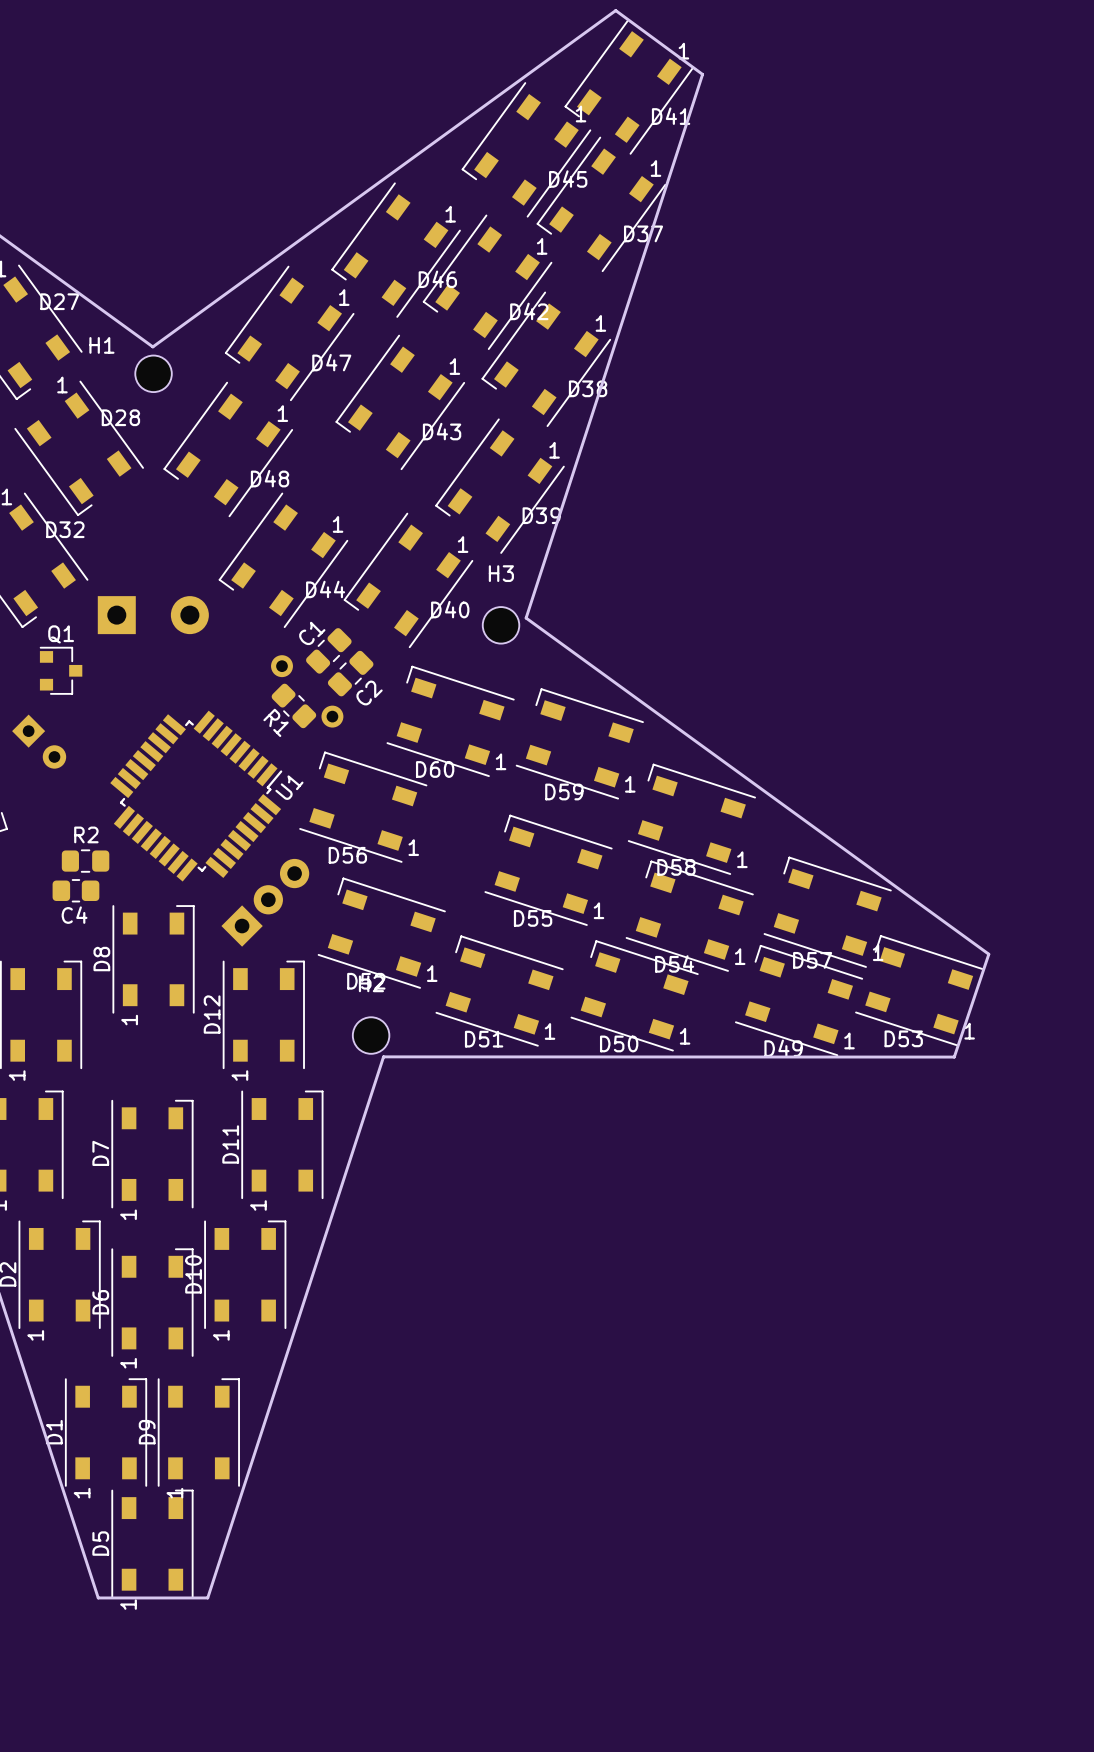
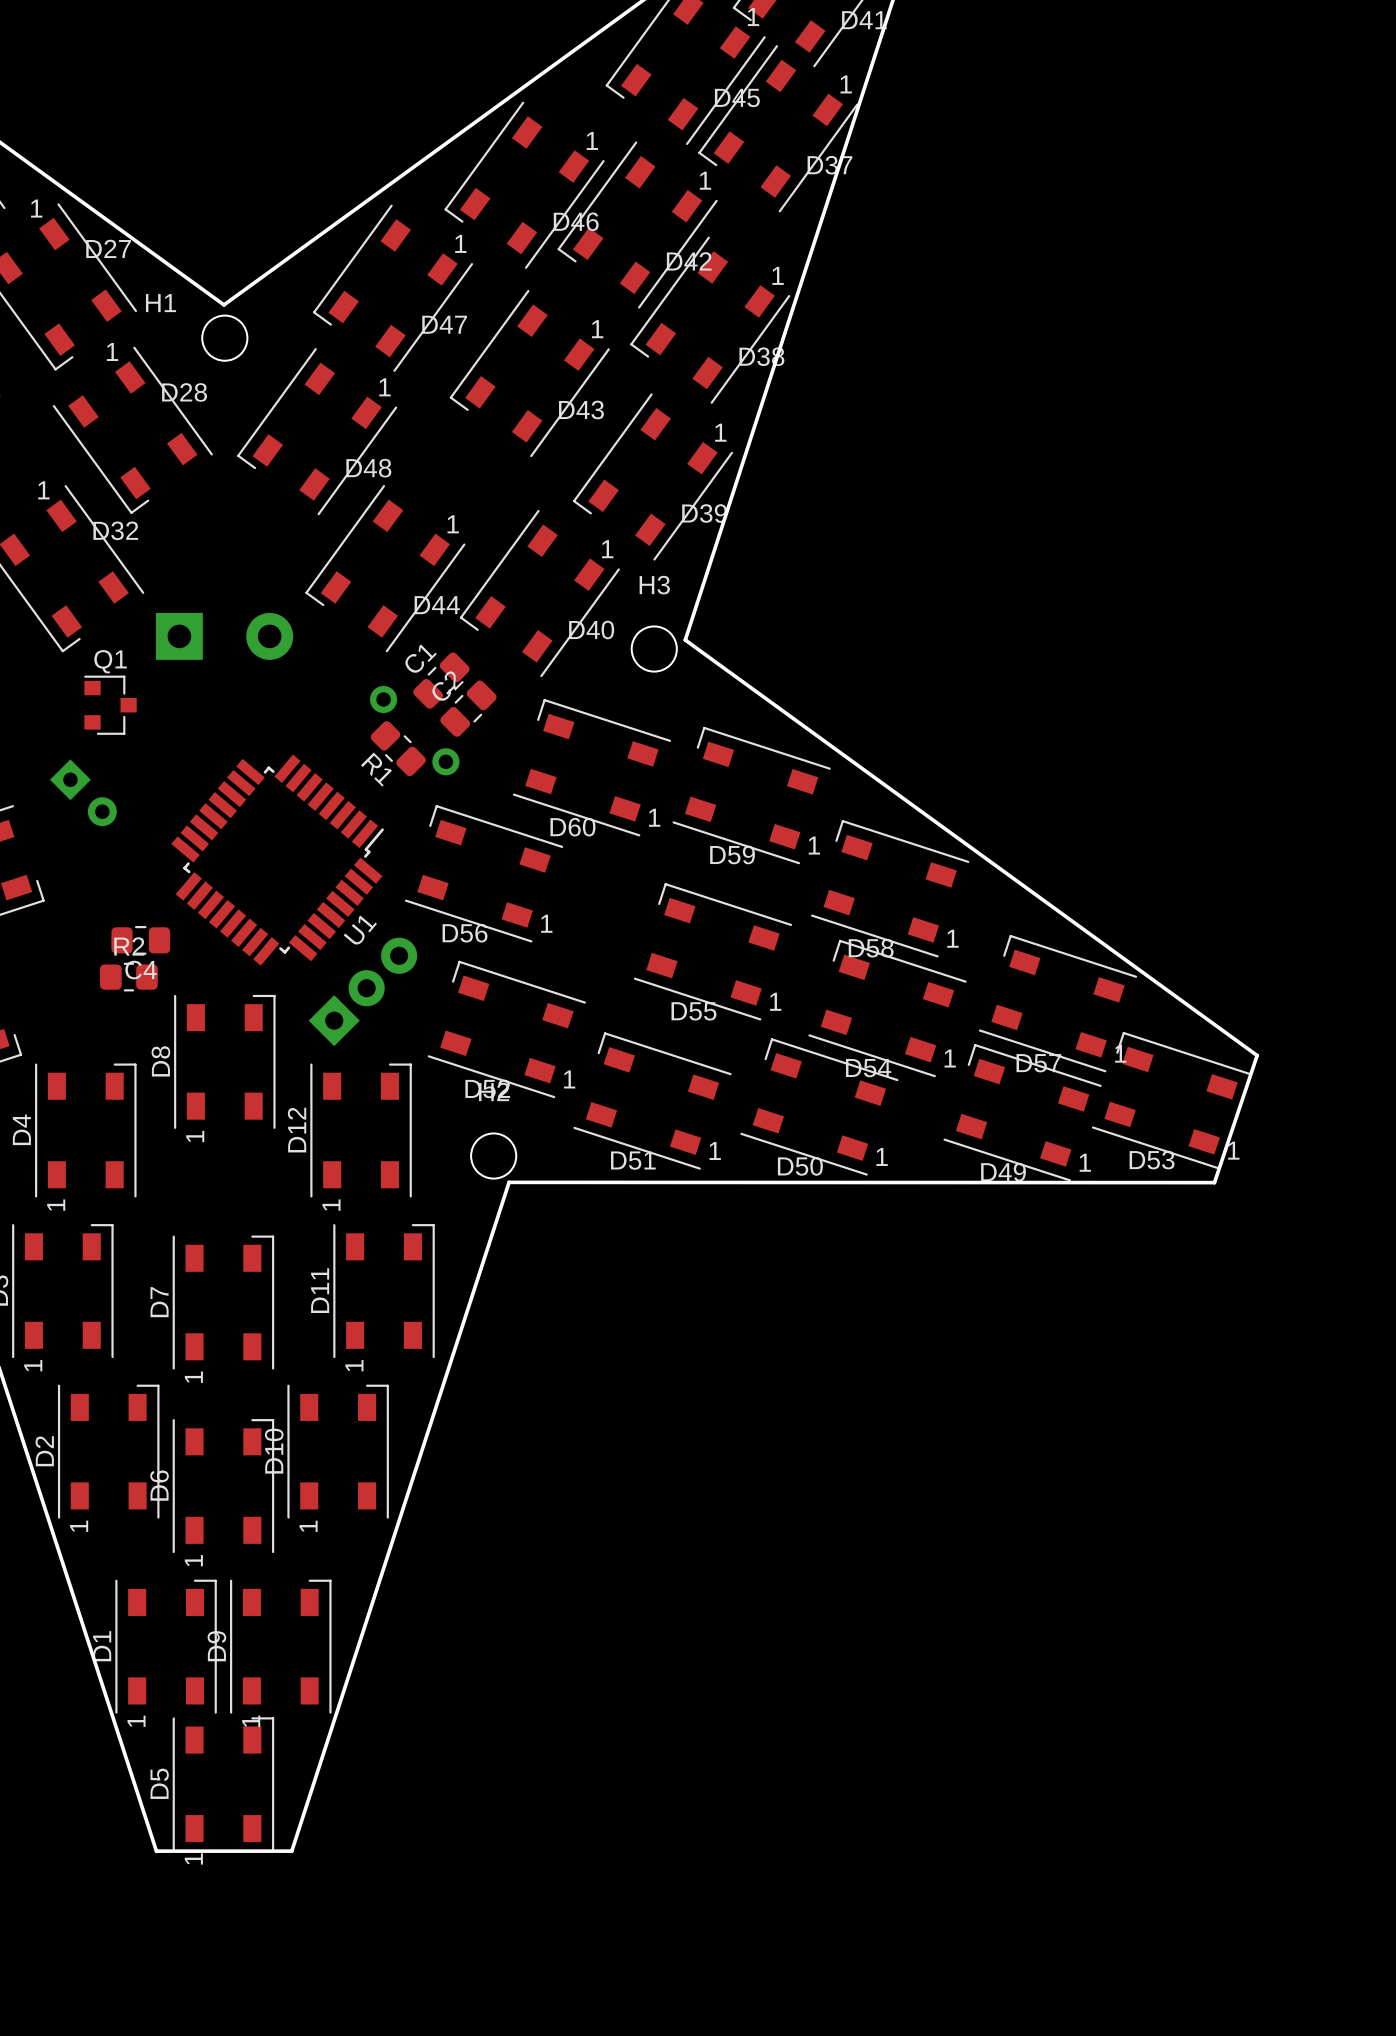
C2 name position: C2 (369, 692) -> C2 (448, 686)
U1 name position: U1 (289, 787) -> U1 (360, 930)
R2 name position: R2 (86, 834) -> R2 (129, 946)
C4 name position: C4 (74, 915) -> C4 (141, 970)

